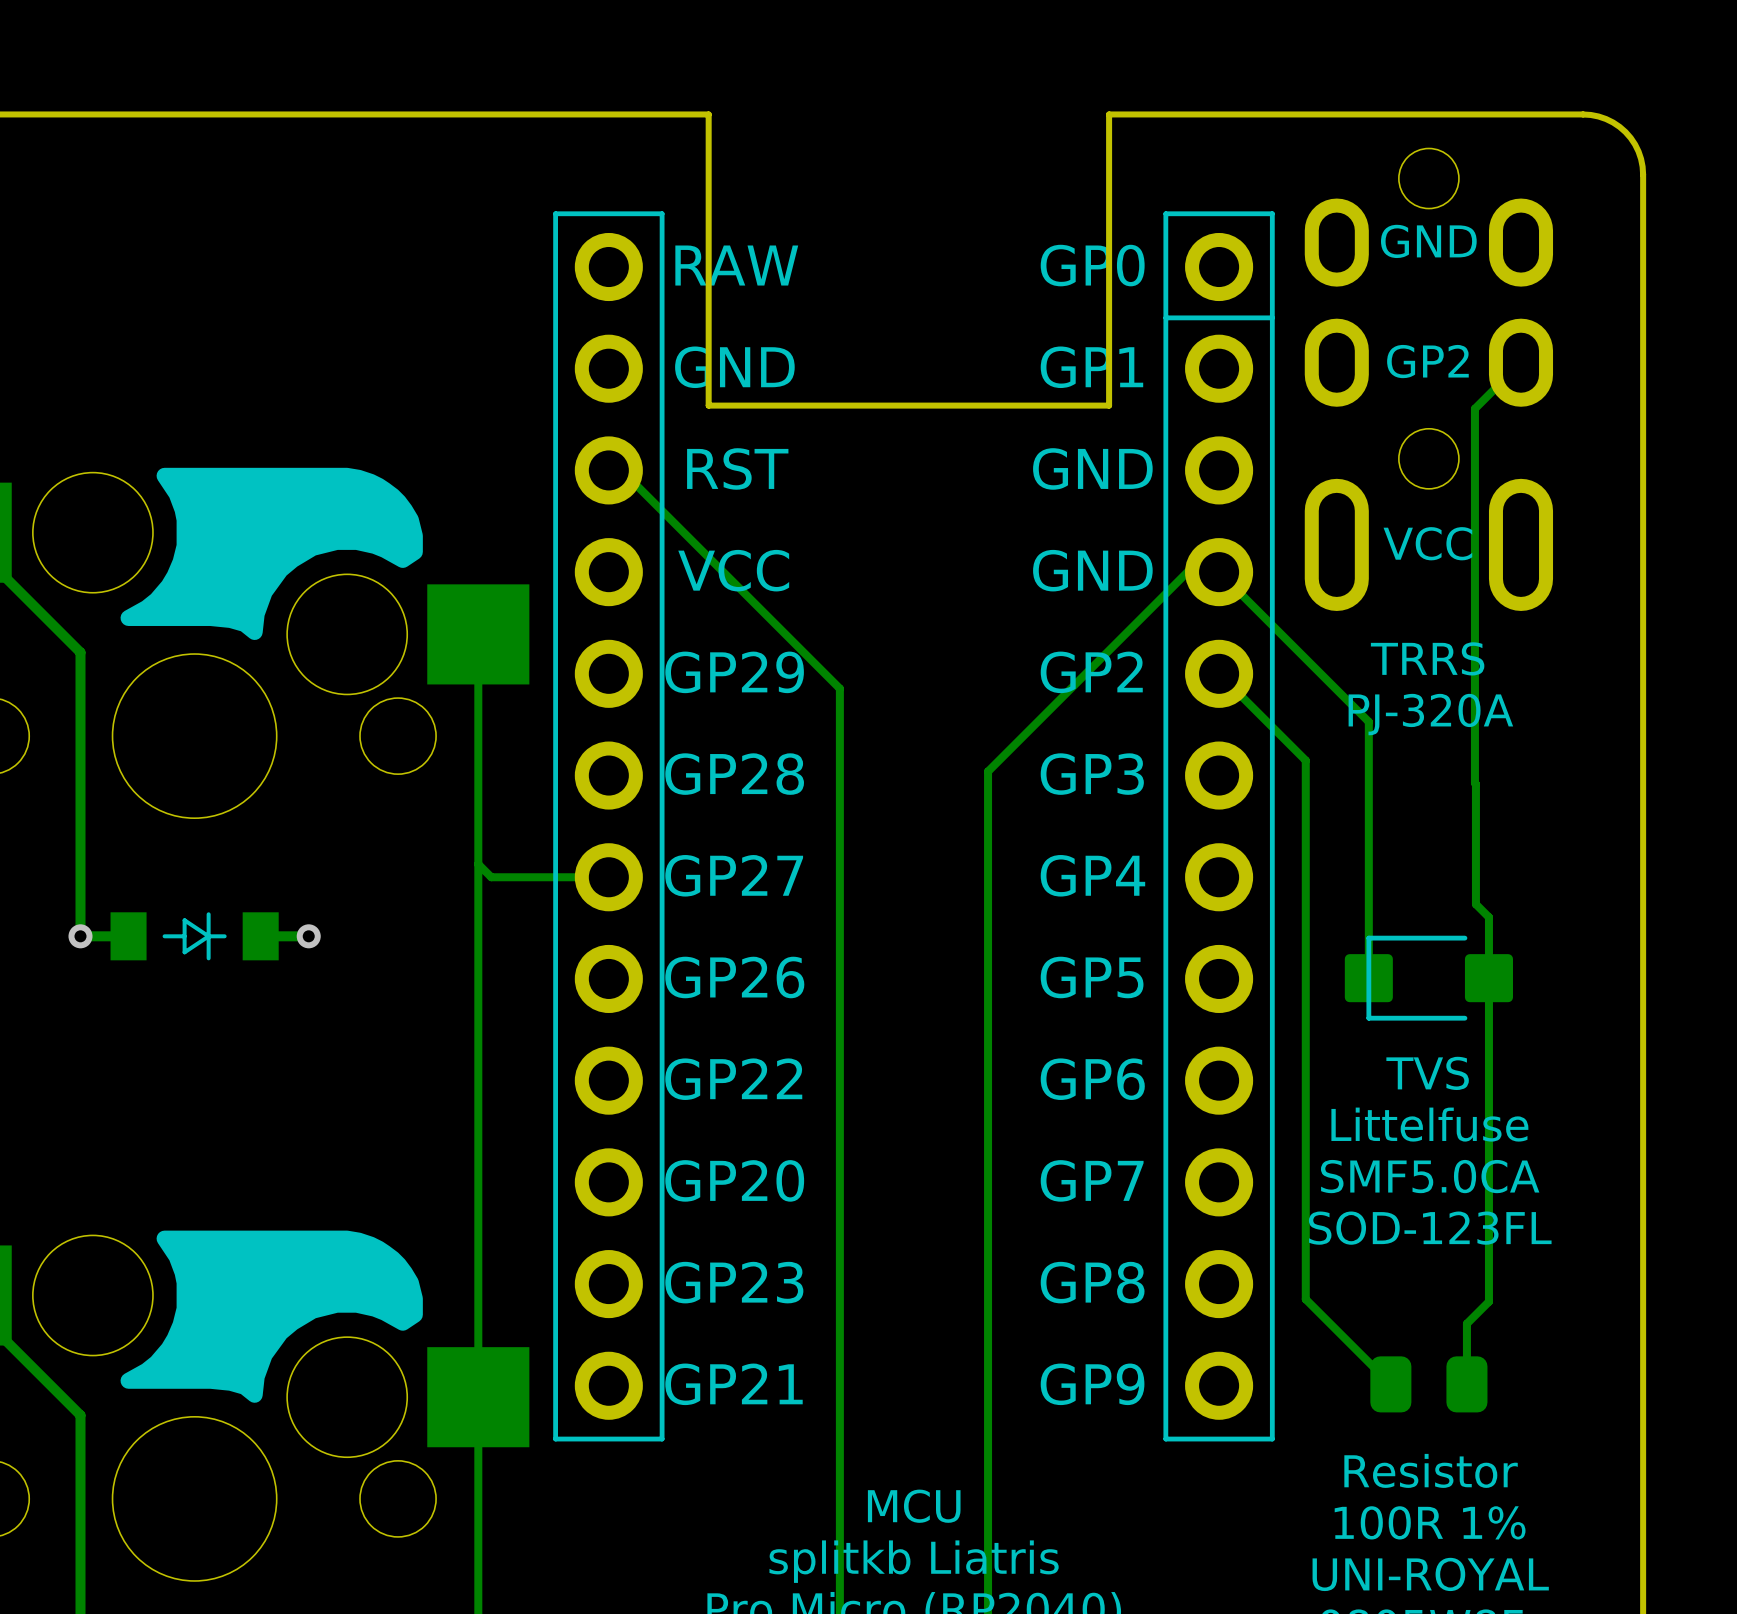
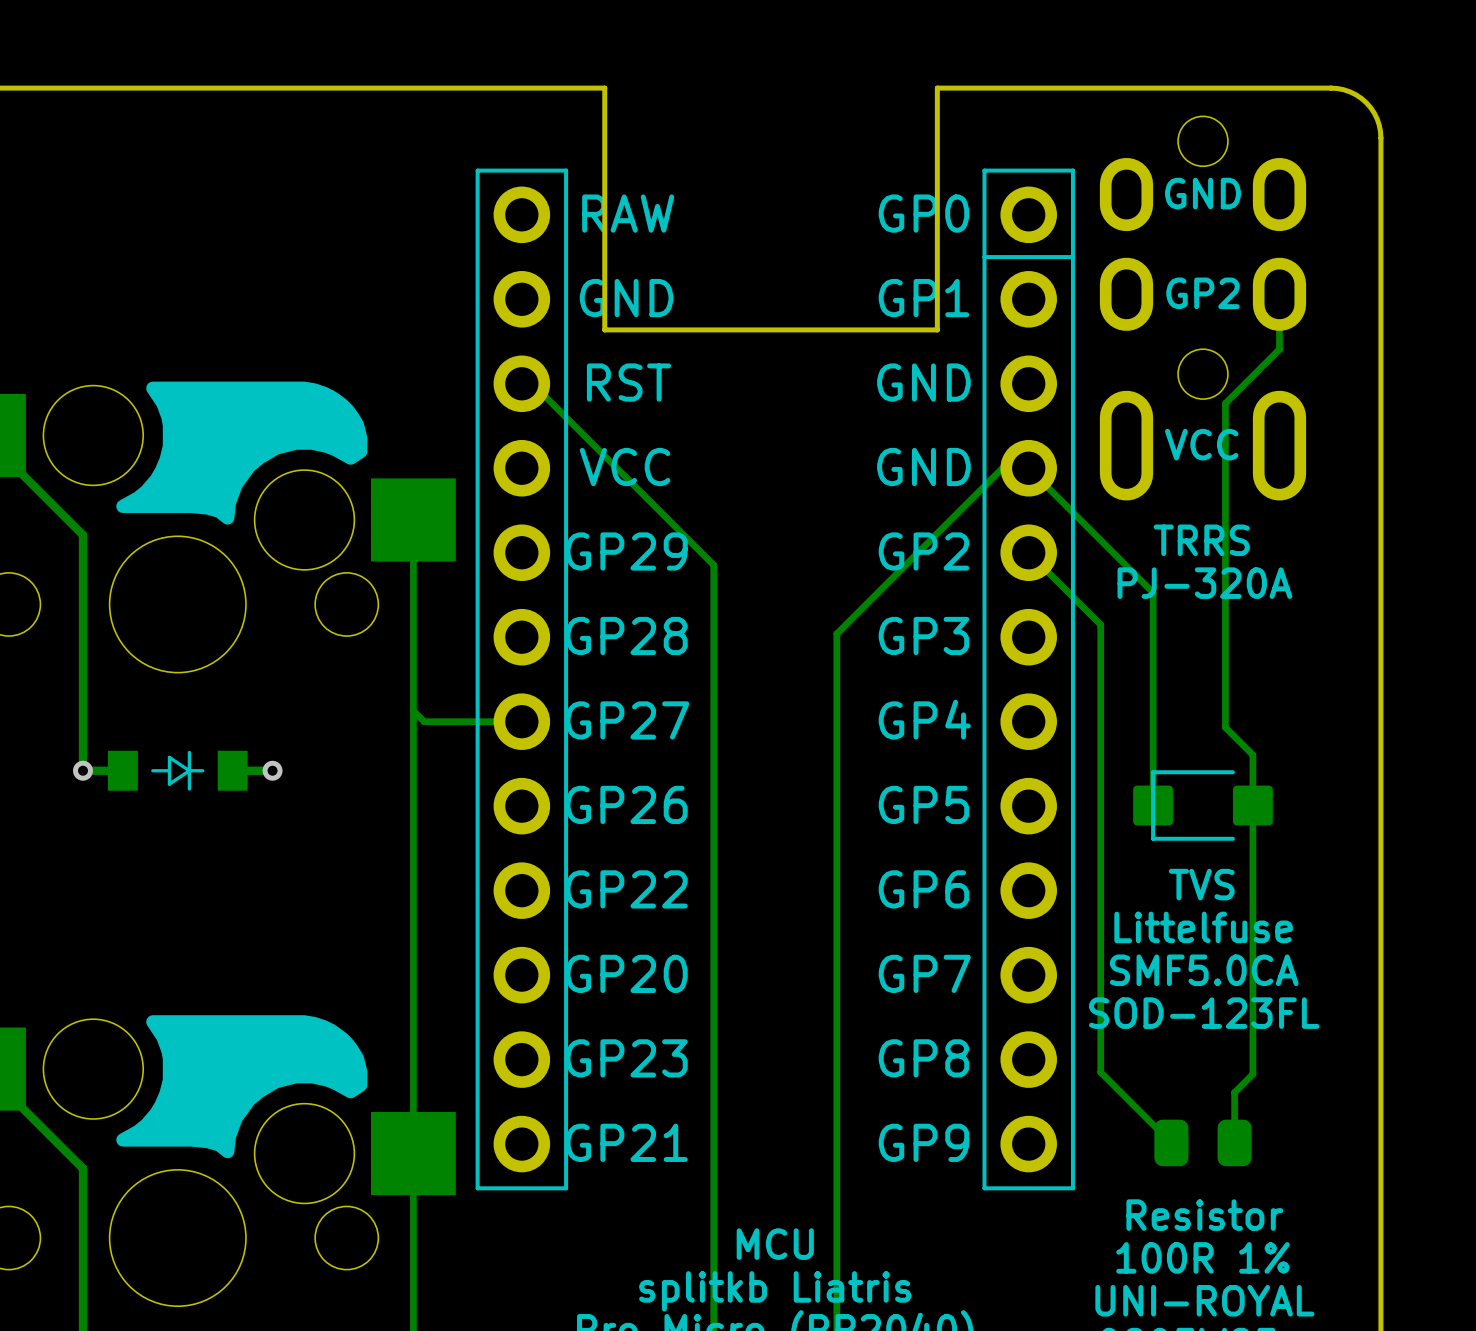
track: (1521, 362) (1474, 408) (1475, 904) -> (1279, 294) (1279, 349) (1225, 403) (1225, 727) (1242, 744)

